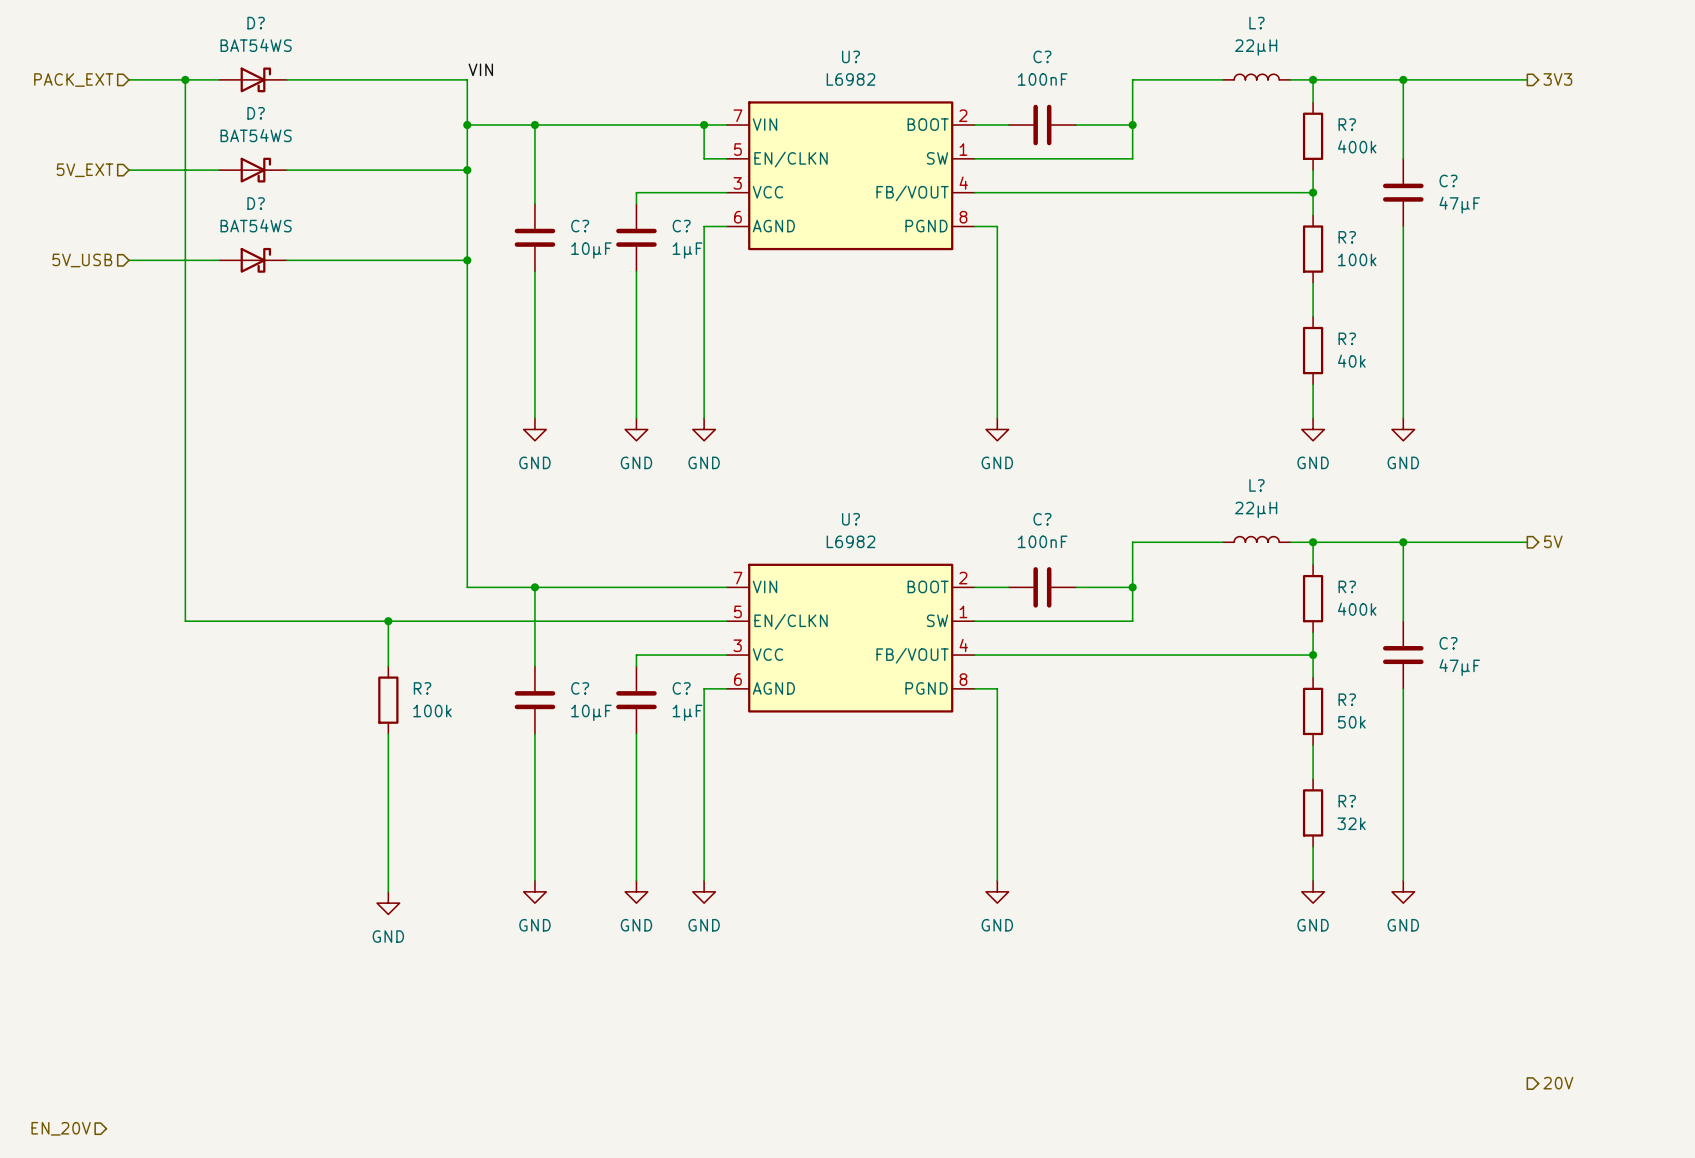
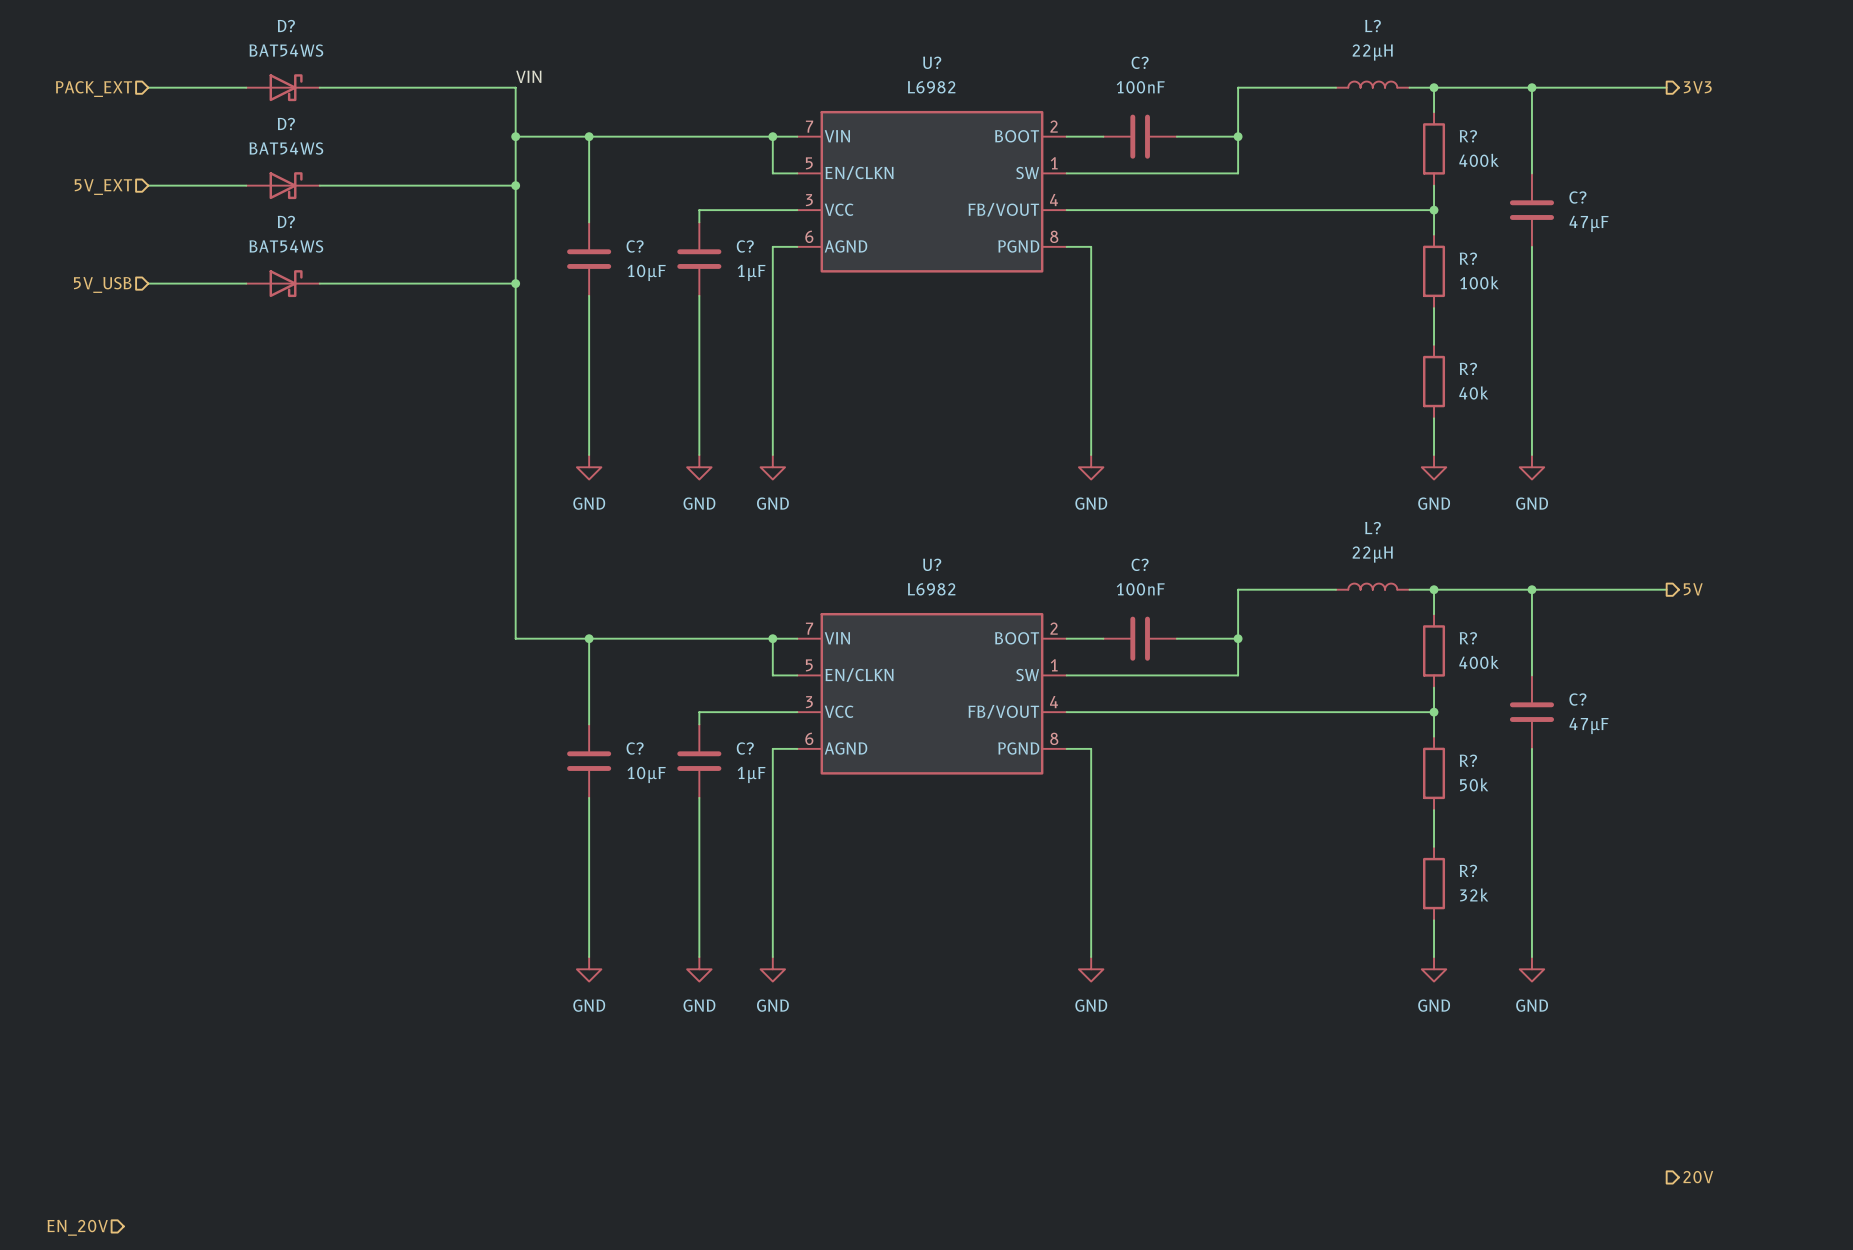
wire: (185, 79) (185, 621) (704, 621) -> (772, 638) (772, 675)
junction: (185, 79) -> none
junction: none -> (772, 638)
wire: (388, 621) (388, 666) -> none
junction: (388, 621) -> none
R?: 100k (388, 700) -> none
wire: (388, 733) (388, 891) -> none
power symbol: GND (388, 903) -> none

